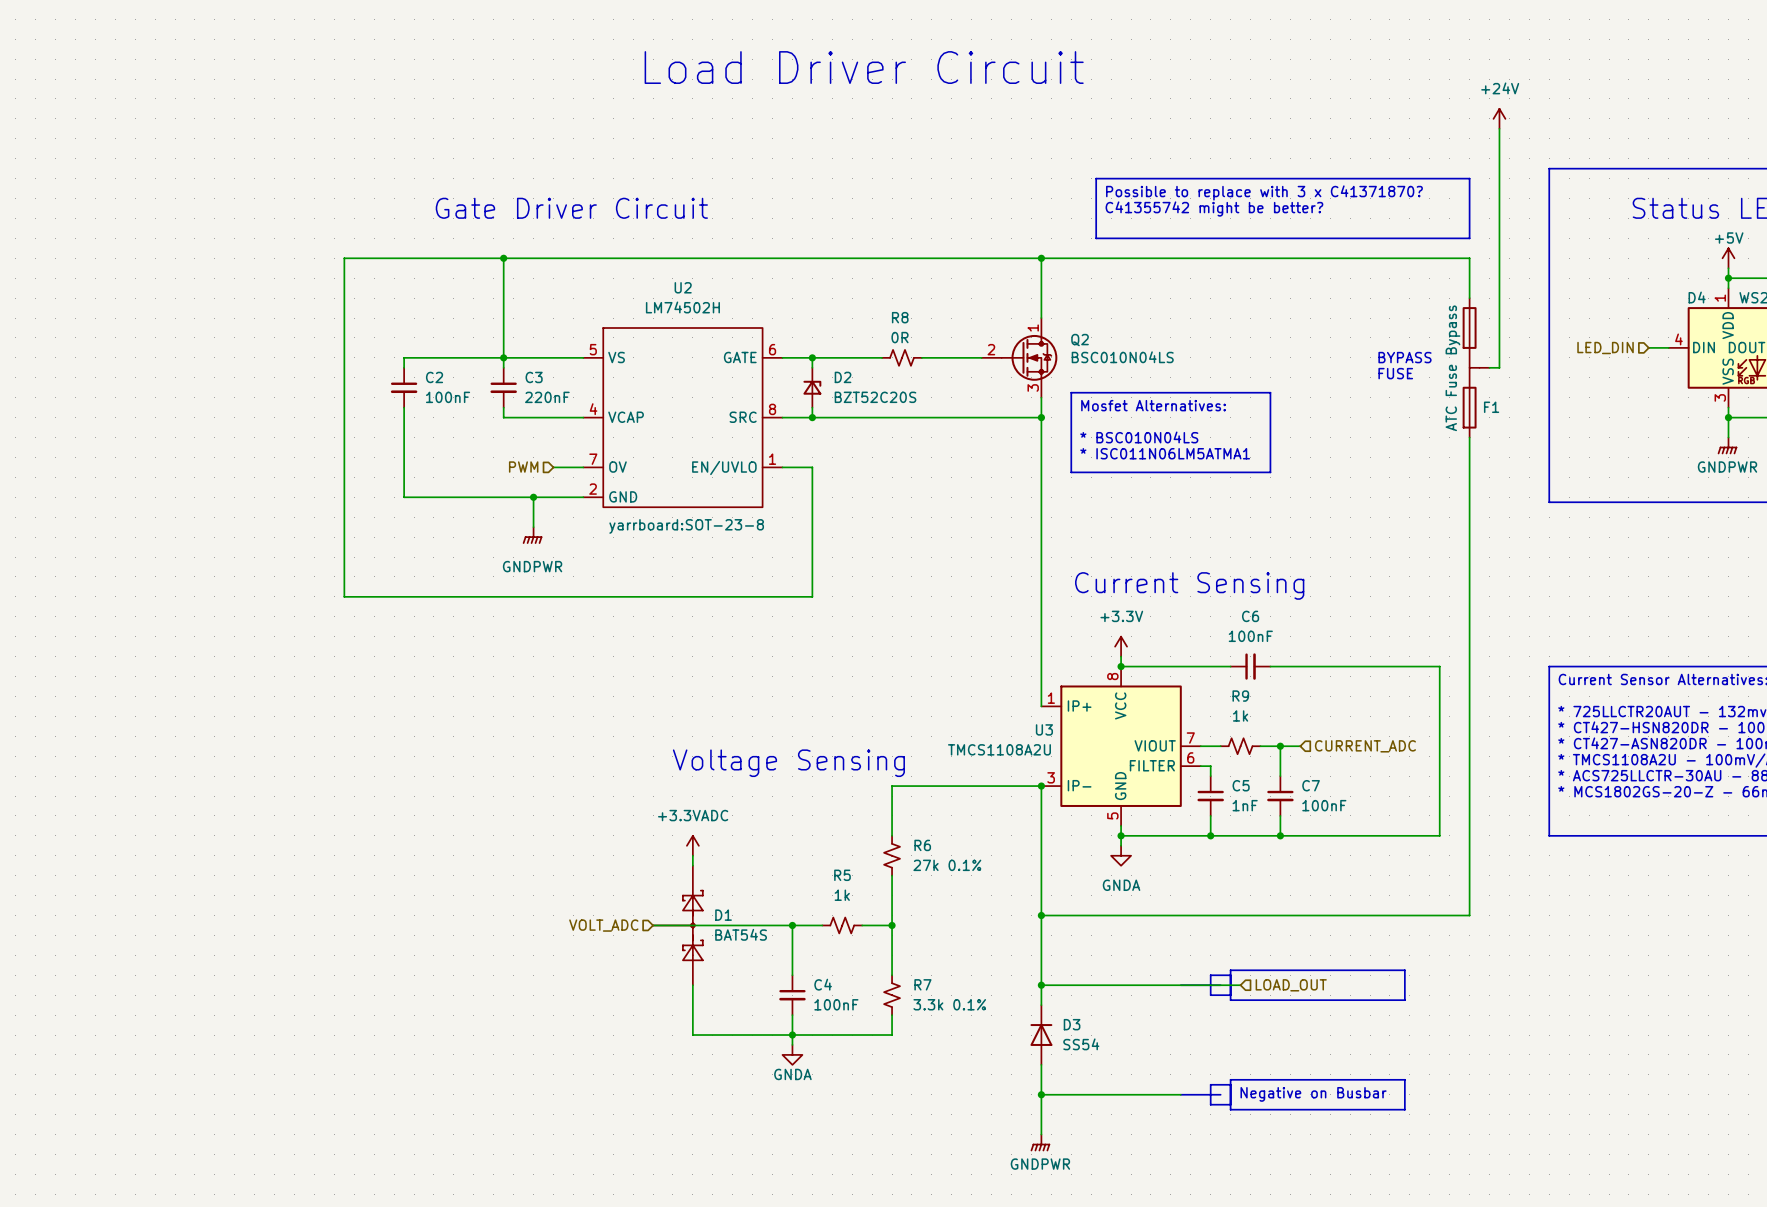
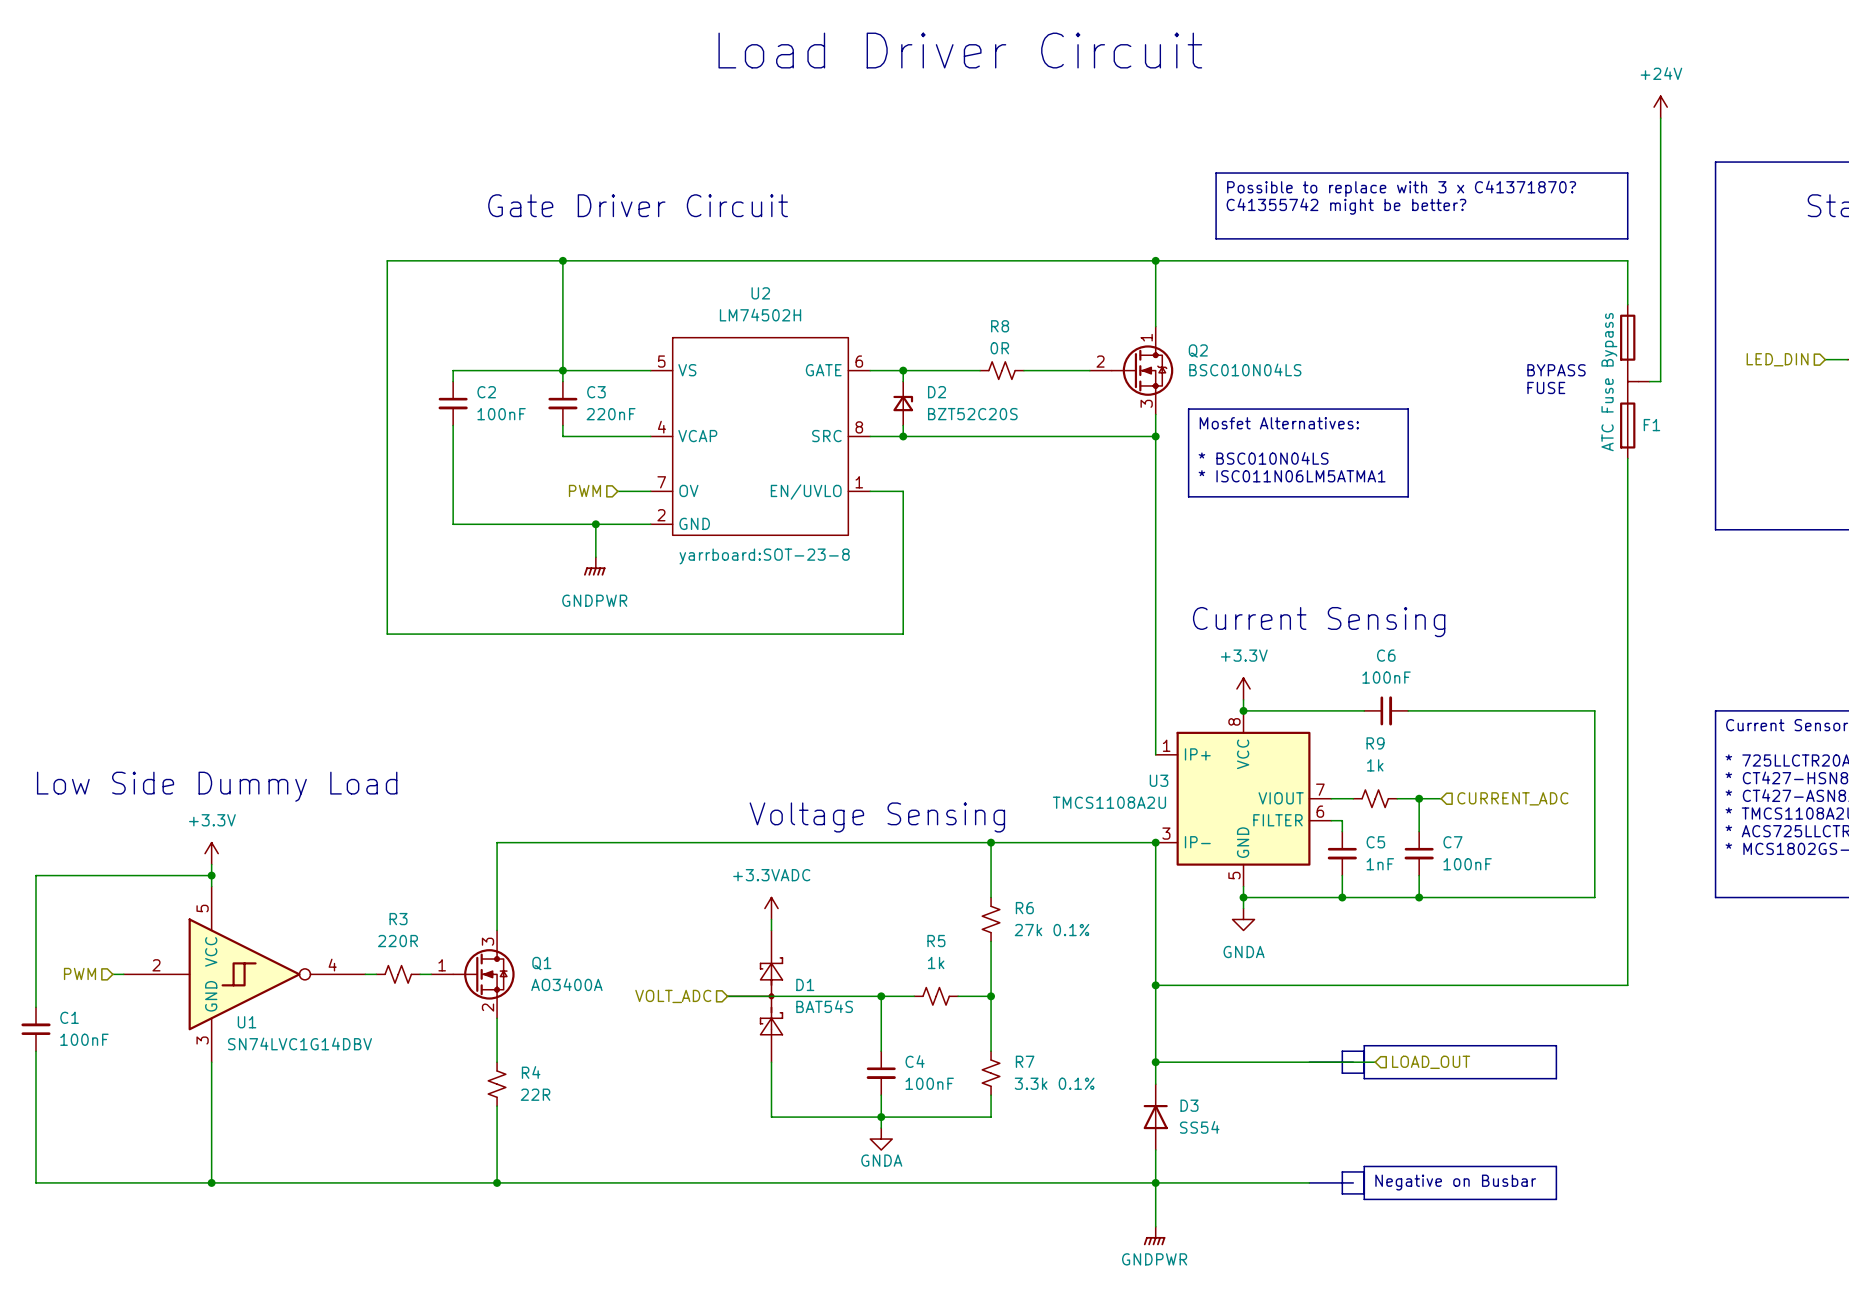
text: none -> Low Side Dummy Load (217, 786)
wire: none -> (991, 842) (497, 842) (497, 930)
junction: none -> (991, 842)
power symbol: none -> +3.3V (211, 853)
wire: none -> (211, 864) (211, 886)
wire: none -> (211, 875) (36, 875) (36, 1007)
junction: none -> (211, 875)
hierarchical label: none -> PWM (80, 973)
wire: none -> (112, 974) (123, 974)
U1: none -> SN74LVC1G14DBV (244, 974)
wire: none -> (365, 974) (376, 974)
R3: none -> 220R (398, 974)
wire: none -> (420, 974) (431, 974)
Q1: none -> AO3400A (472, 974)
wire: none -> (497, 1018) (497, 1062)
C1: none -> 100nF (36, 1029)
wire: none -> (36, 1051) (36, 1182) (1155, 1182)
wire: none -> (211, 1062) (211, 1182)
R4: none -> 22R (497, 1084)
wire: none -> (497, 1106) (497, 1182)
junction: none -> (211, 1182)
junction: none -> (497, 1182)

